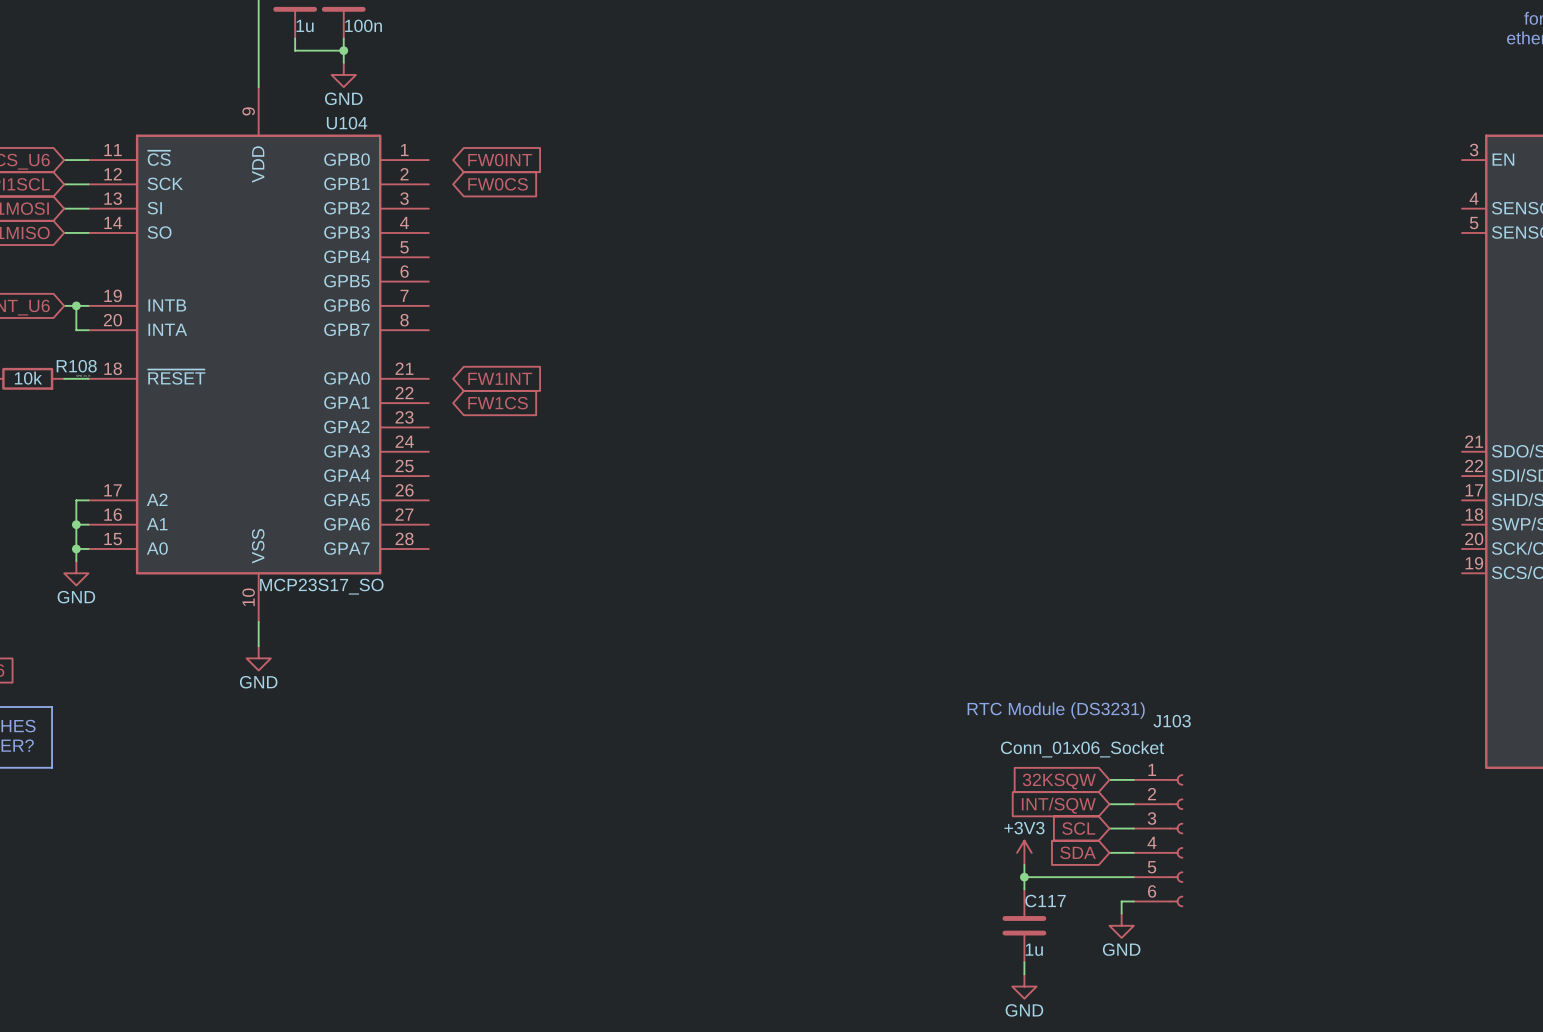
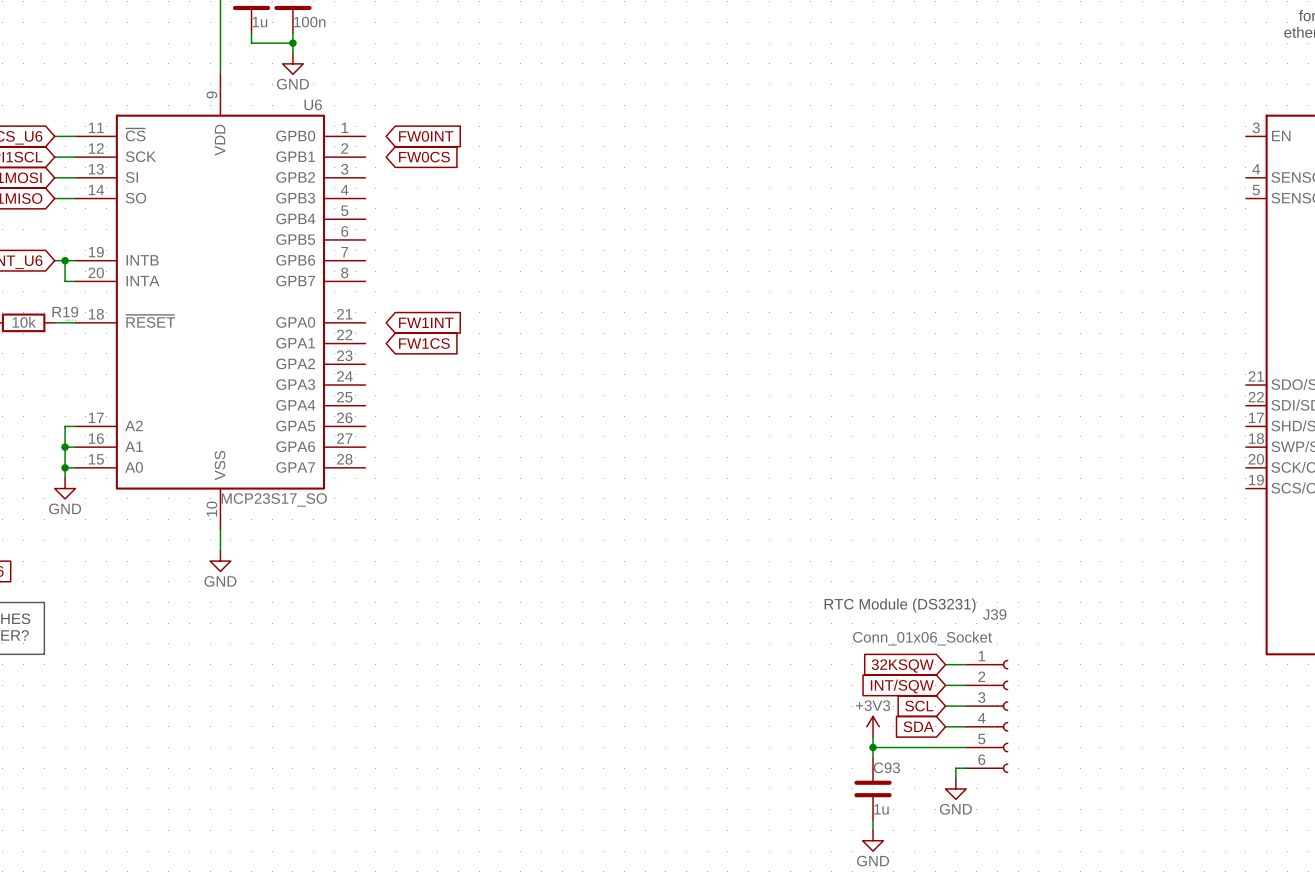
U104 name: U104 (347, 123) -> U6 (313, 104)
R108 name: R108 (76, 366) -> R19 (65, 312)
J103 name: J103 (1172, 721) -> J39 (994, 614)
C117 name: C117 (1045, 901) -> C93 (886, 767)

